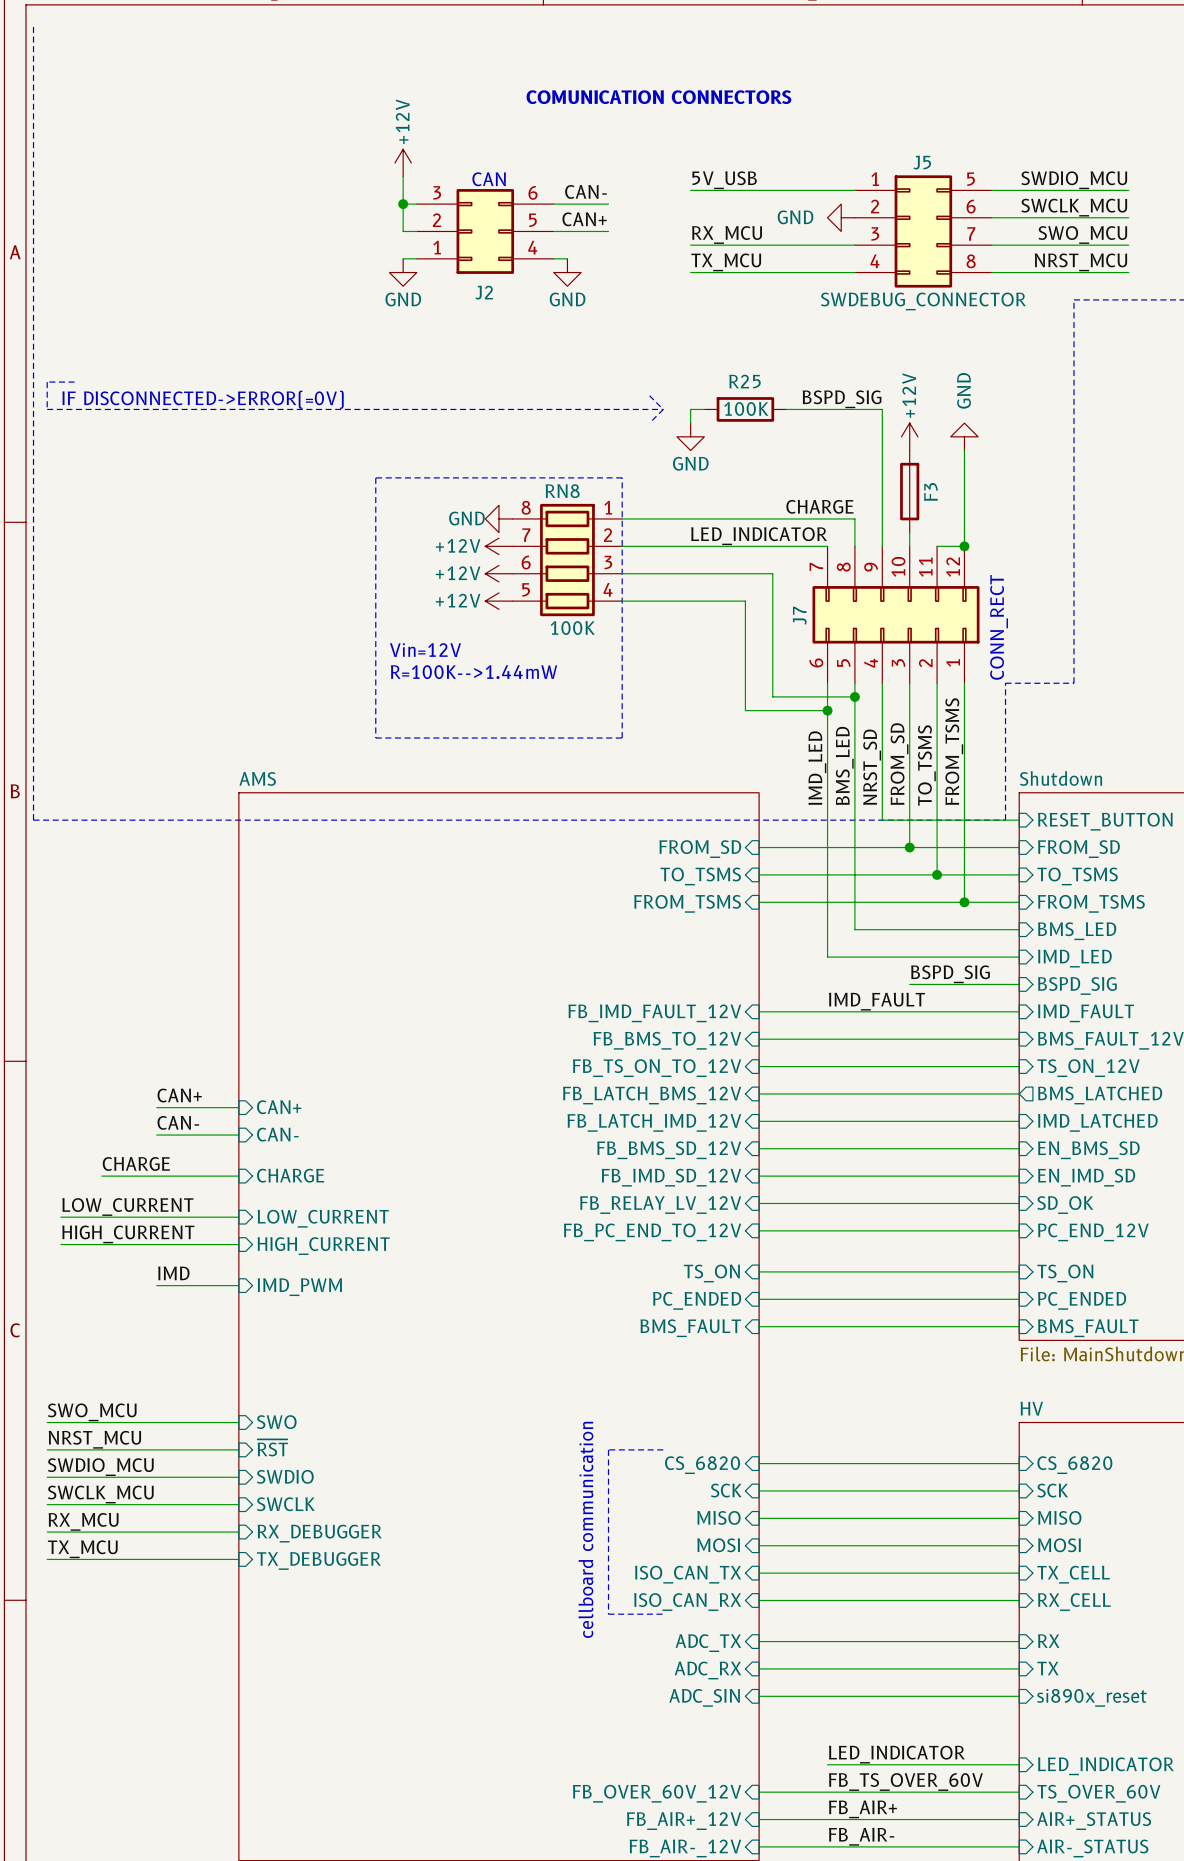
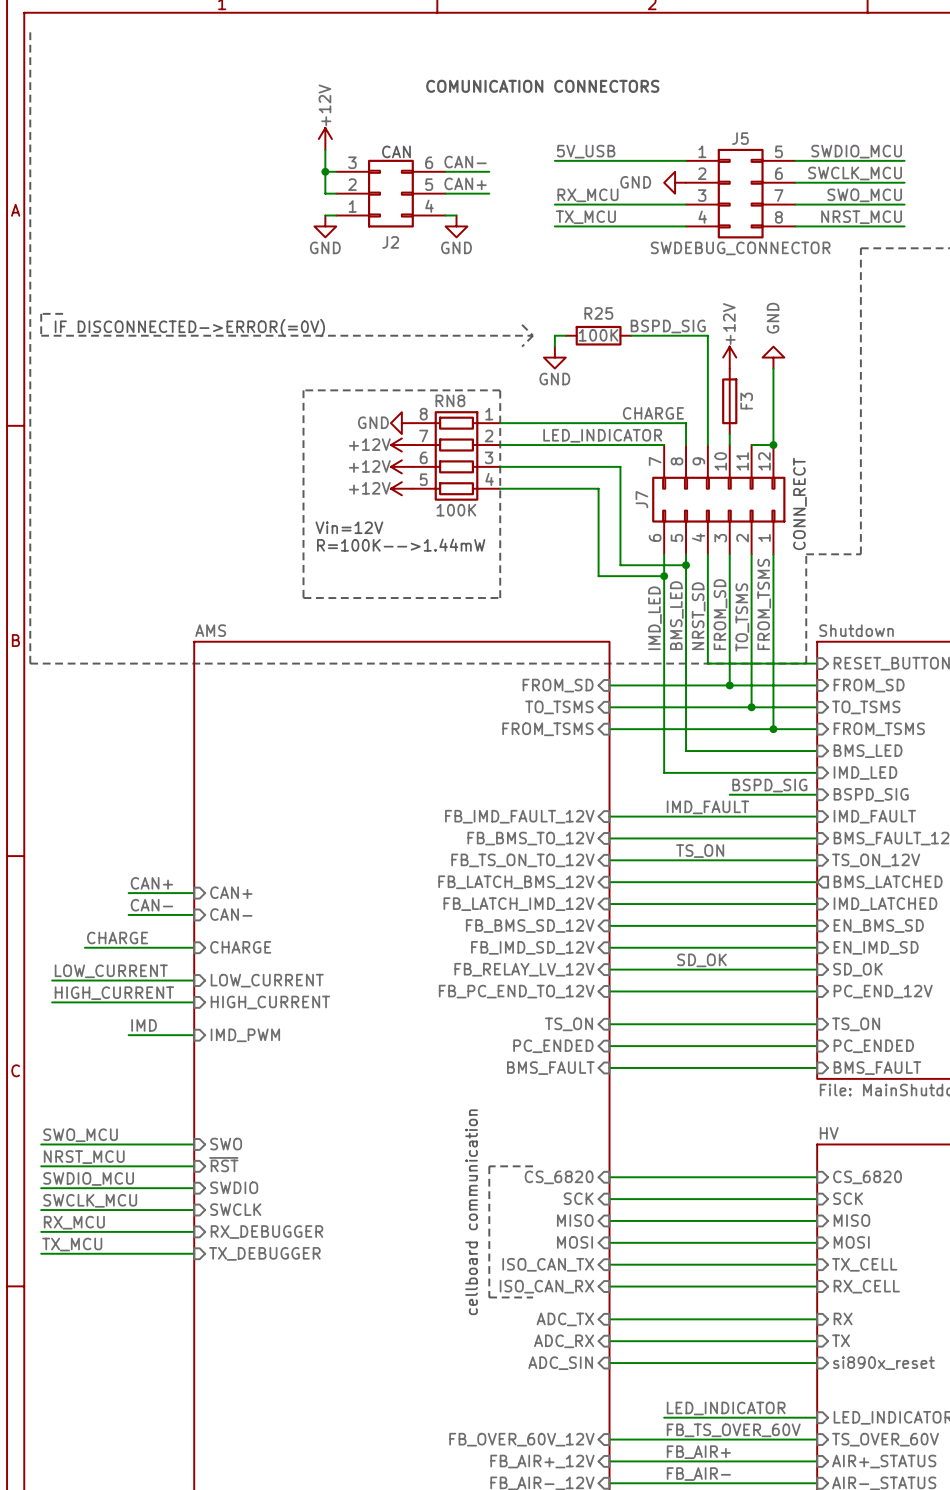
label: none -> TS_ON (700, 851)
label: none -> SD_OK (701, 960)

